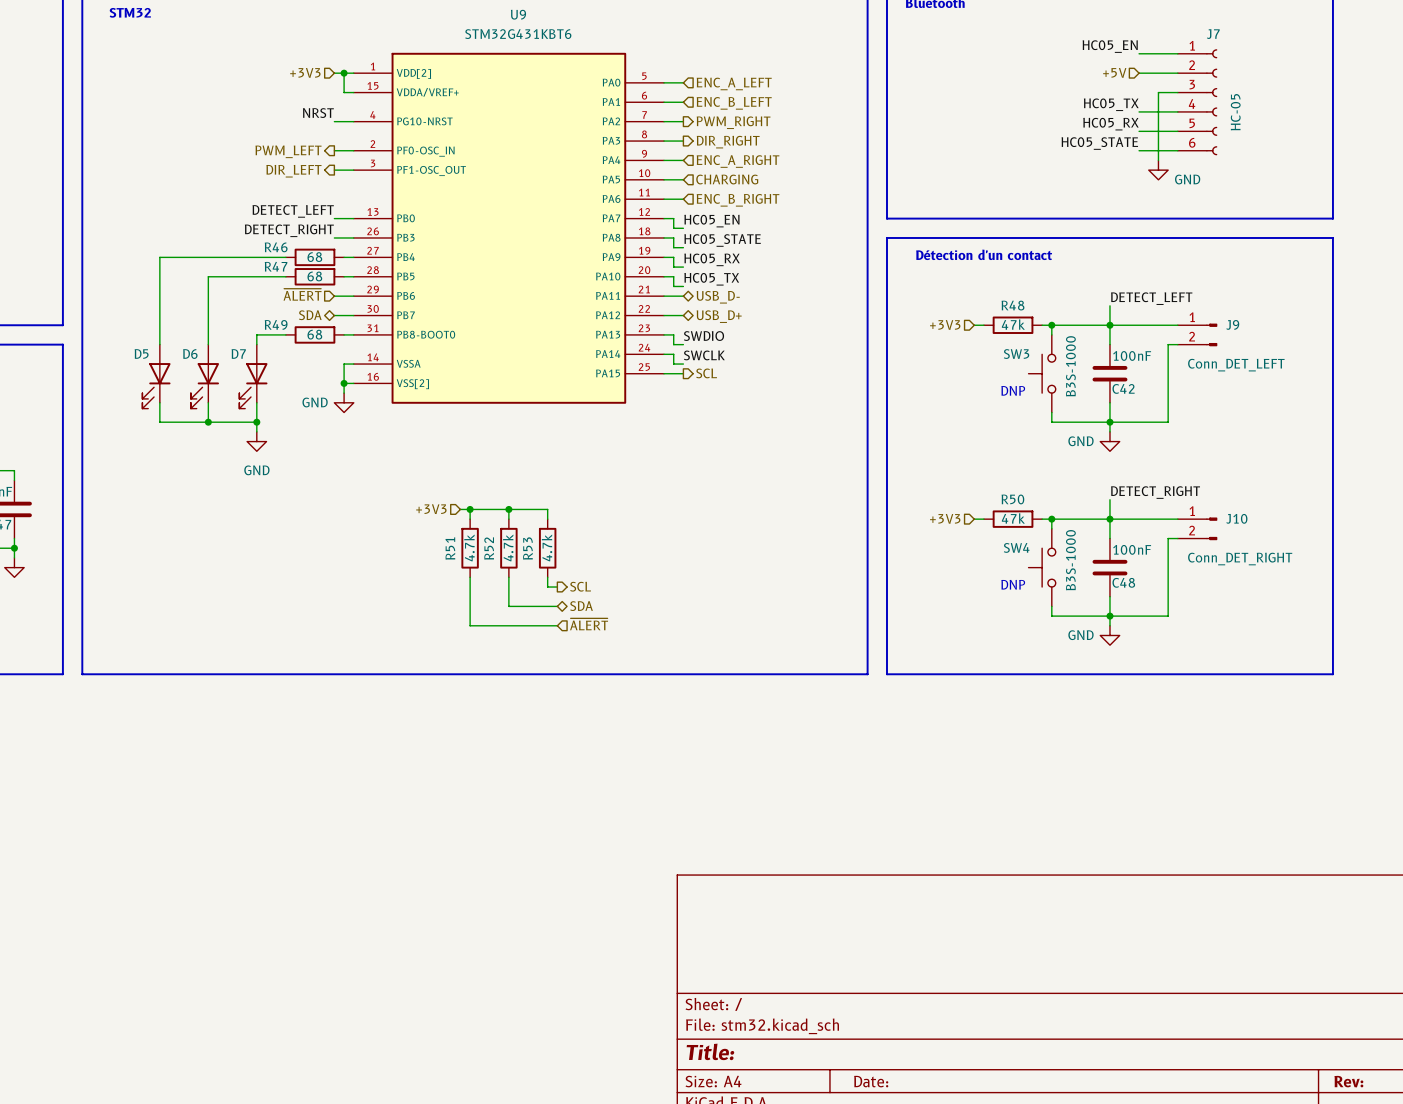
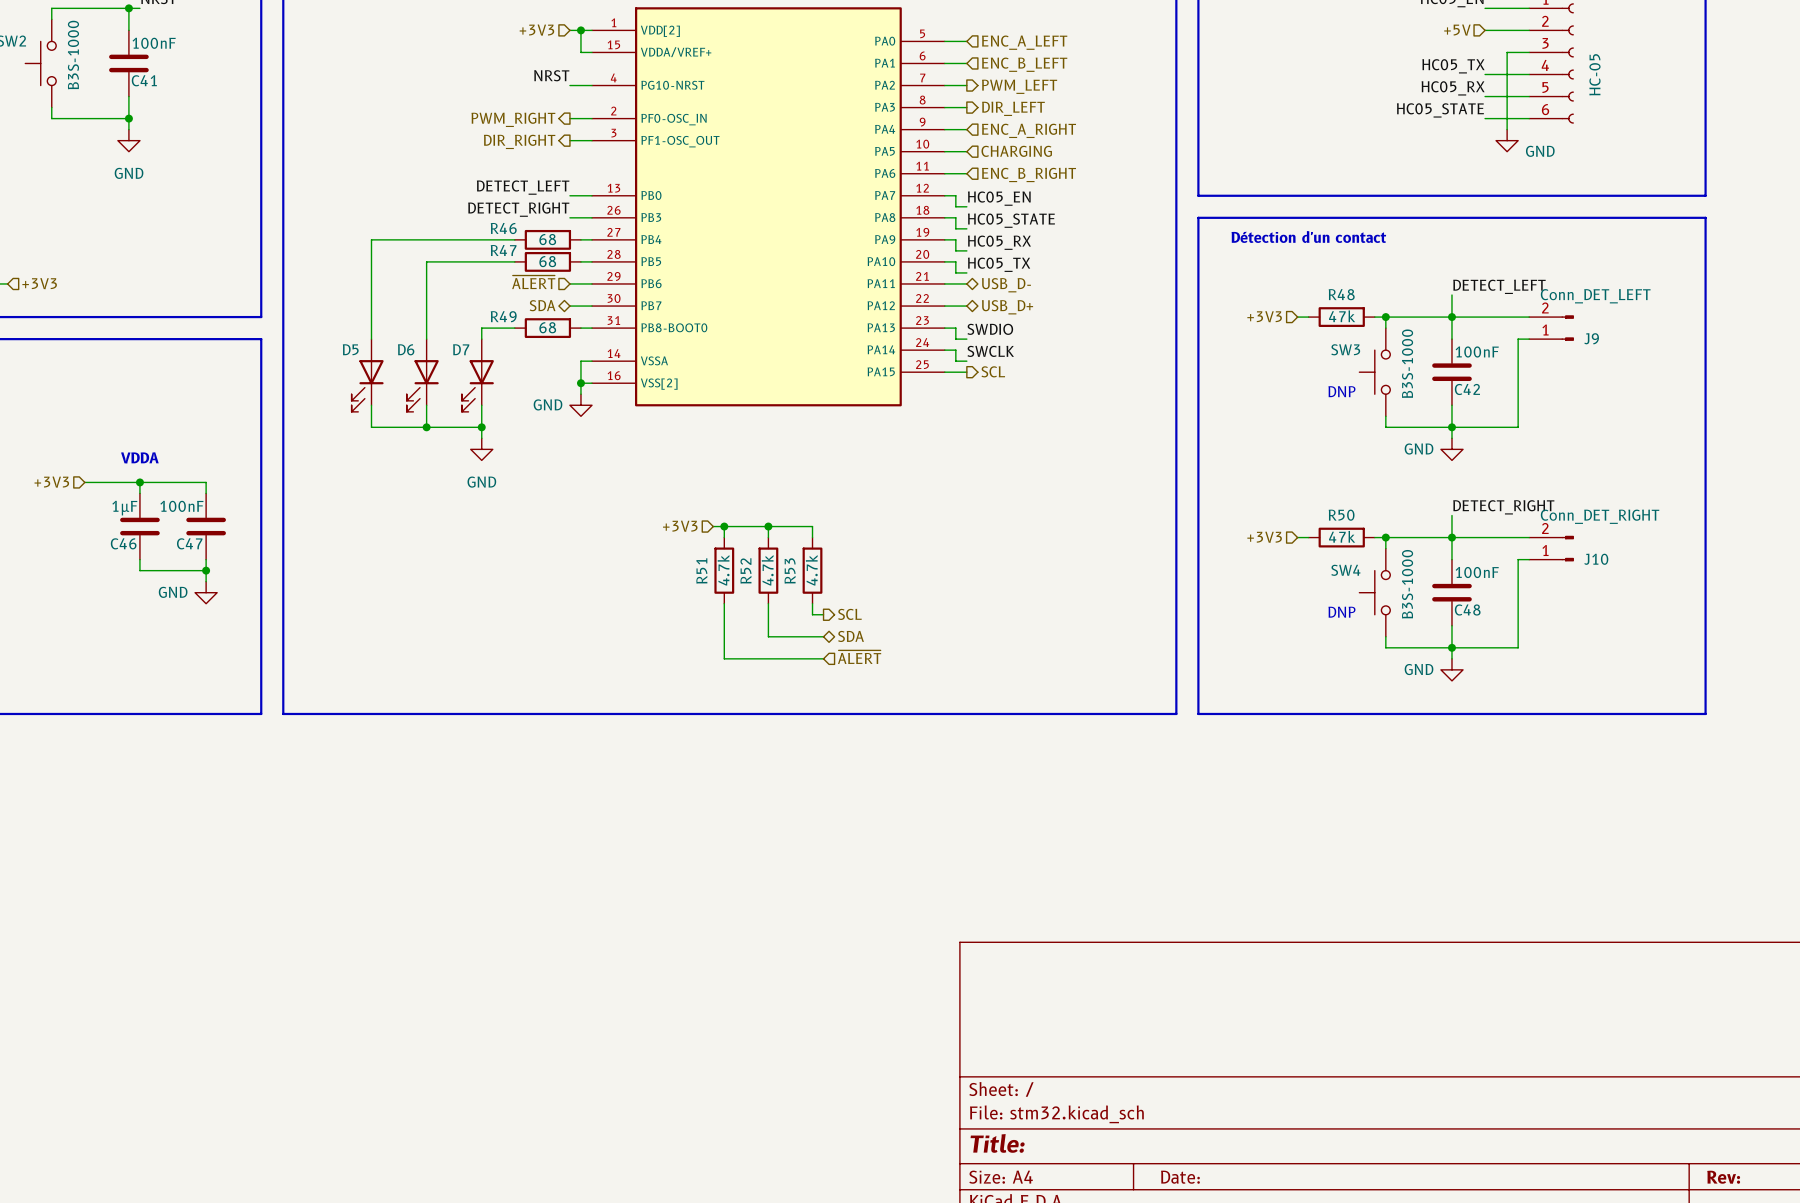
hierarchical label: PWM_RIGHT (733, 122) -> PWM_LEFT (1019, 86)
hierarchical label: DIR_RIGHT (728, 142) -> DIR_LEFT (1013, 108)
hierarchical label: PWM_LEFT (288, 151) -> PWM_RIGHT (513, 119)
hierarchical label: DIR_LEFT (293, 171) -> DIR_RIGHT (519, 141)
J9 flip: as is (1211, 334) -> up-down (1567, 328)
J10 flip: as is (1211, 528) -> up-down (1567, 548)

